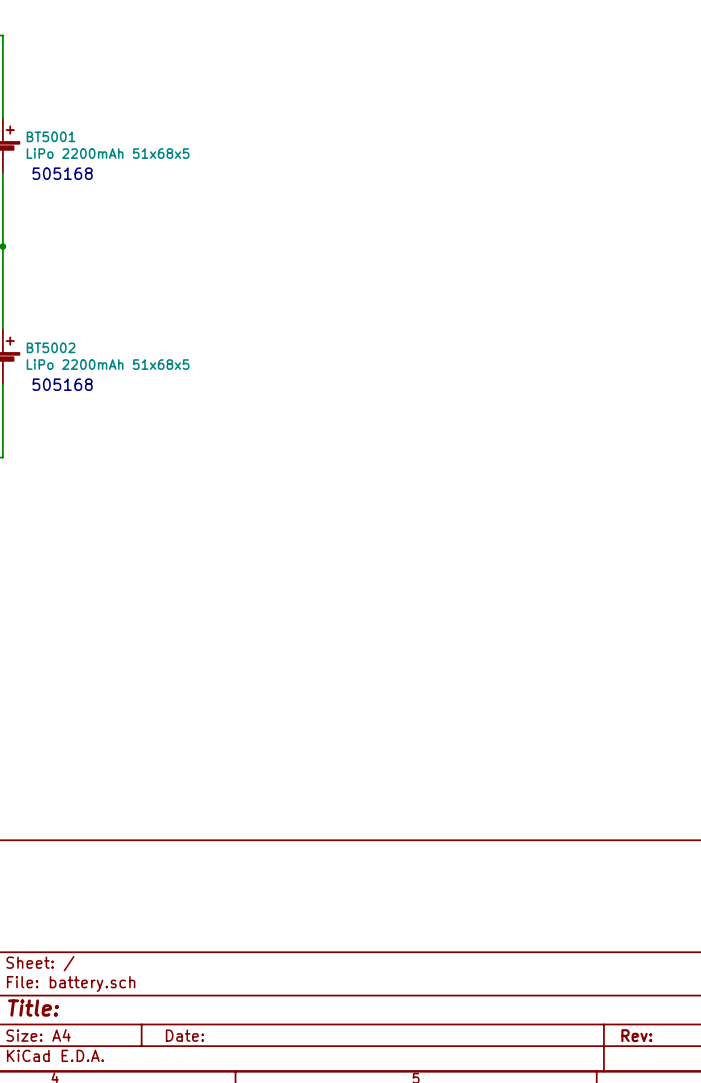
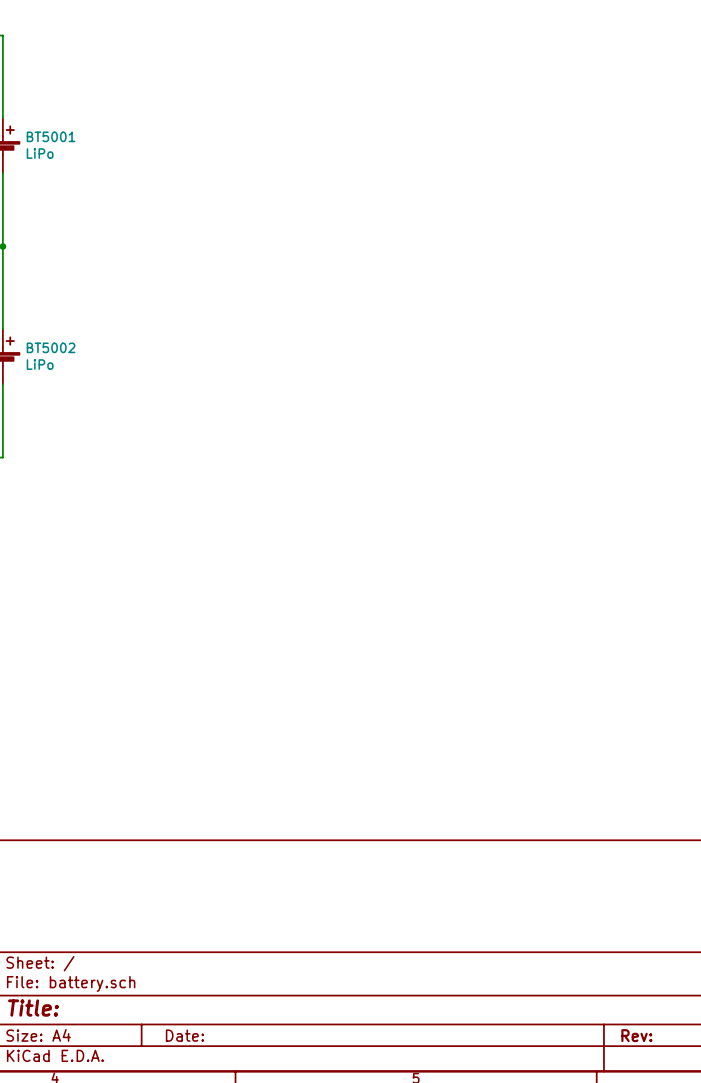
BT5001 value: LiPo 2200mAh 51x68x5 (108, 153) -> LiPo (40, 153)
text: 505168 (62, 173) -> none
BT5002 value: LiPo 2200mAh 51x68x5 (108, 364) -> LiPo (40, 364)
text: 505168 (62, 384) -> none

